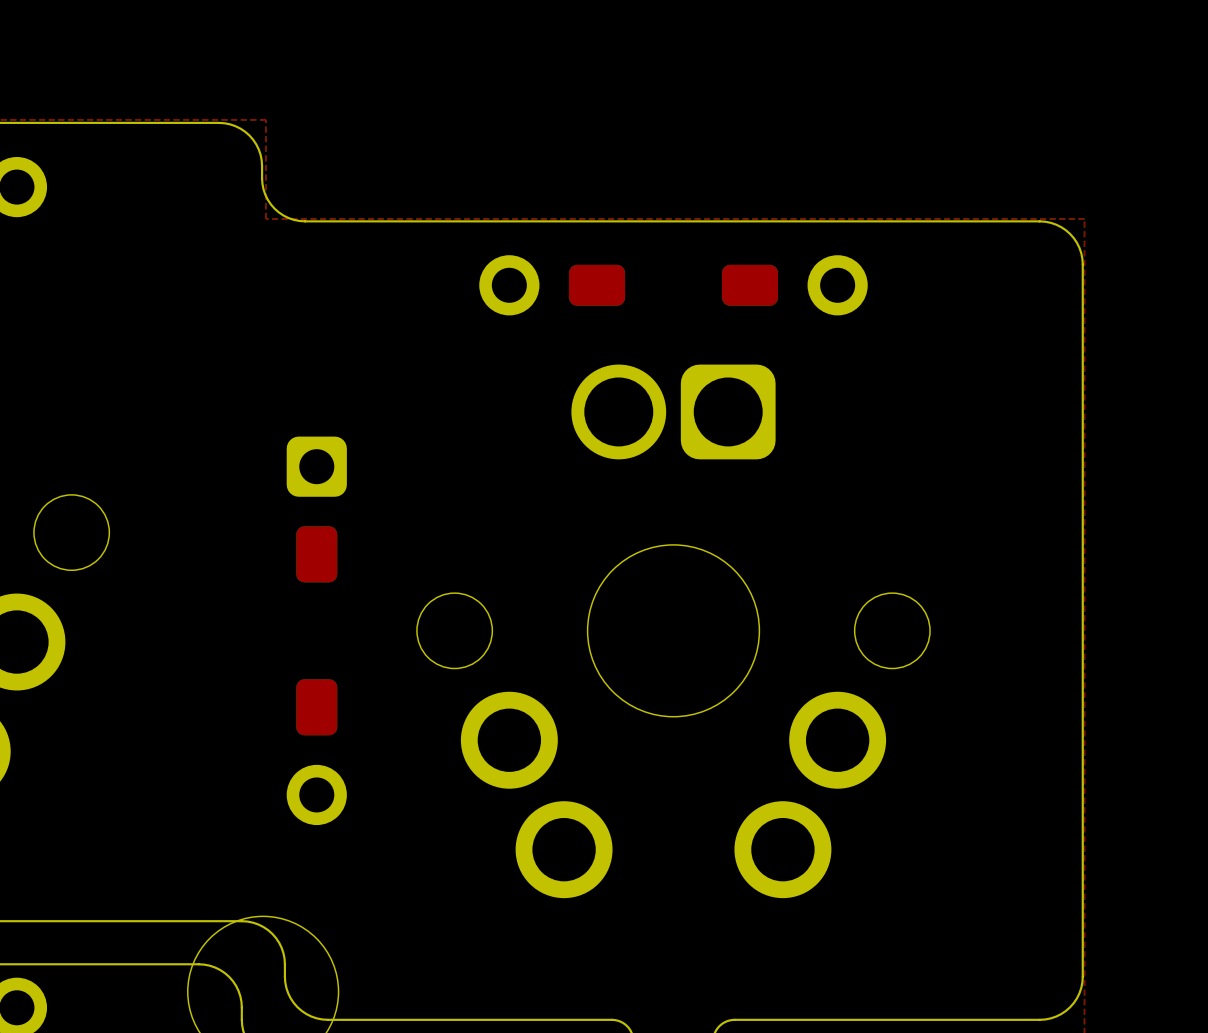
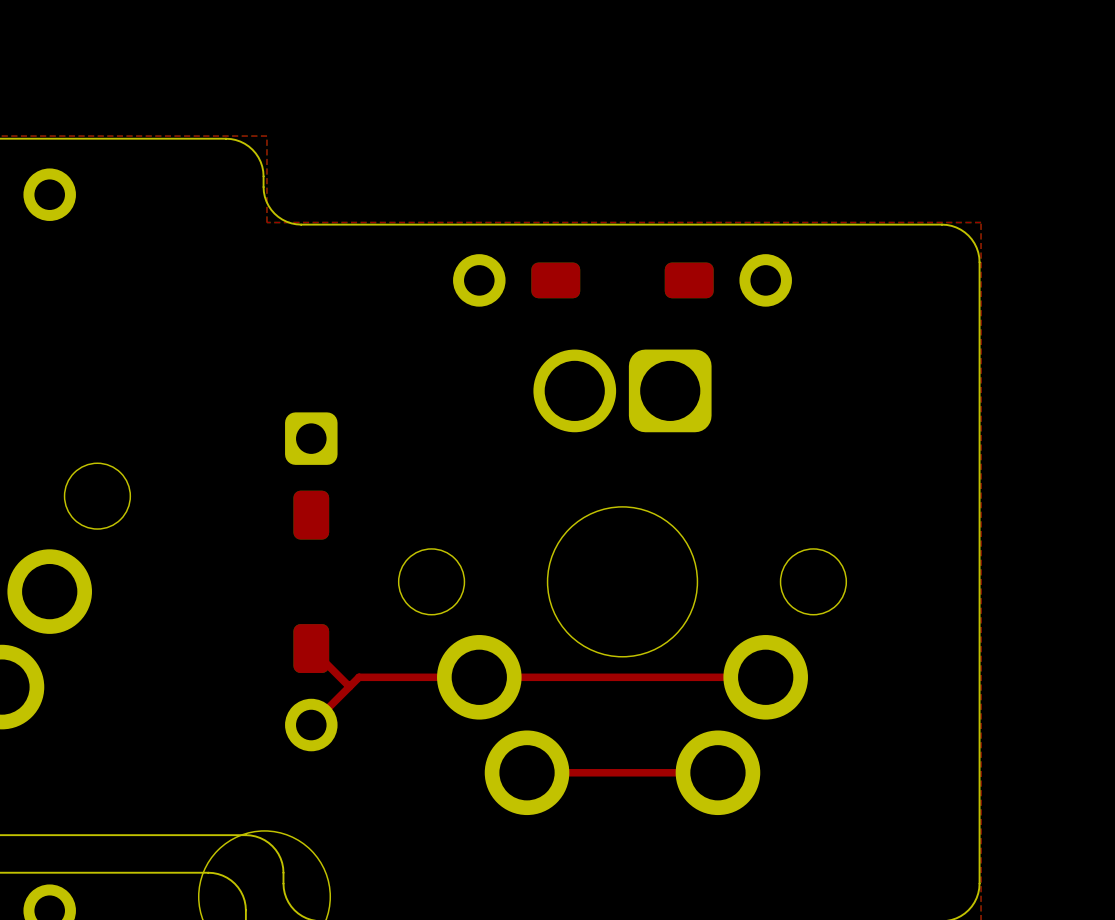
top track: none -> (311, 648) (349, 686)
top track: none -> (765, 677) (359, 677) (311, 725)
top track: none -> (527, 772) (717, 772)

